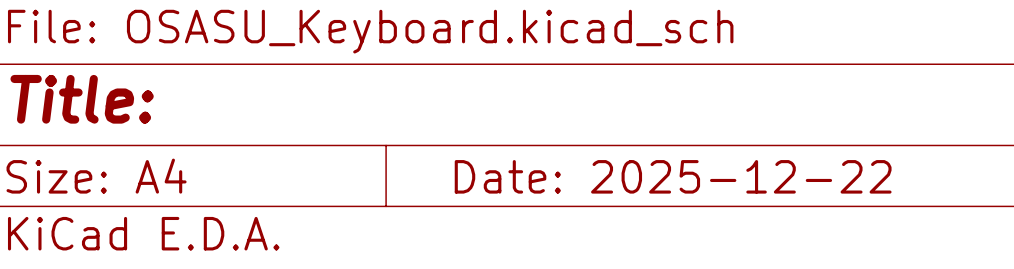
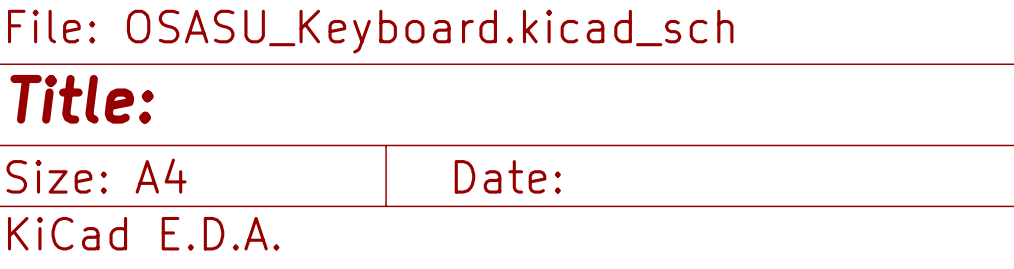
title block: Date: 2025-12-22 (673, 176) -> Date: (507, 176)

